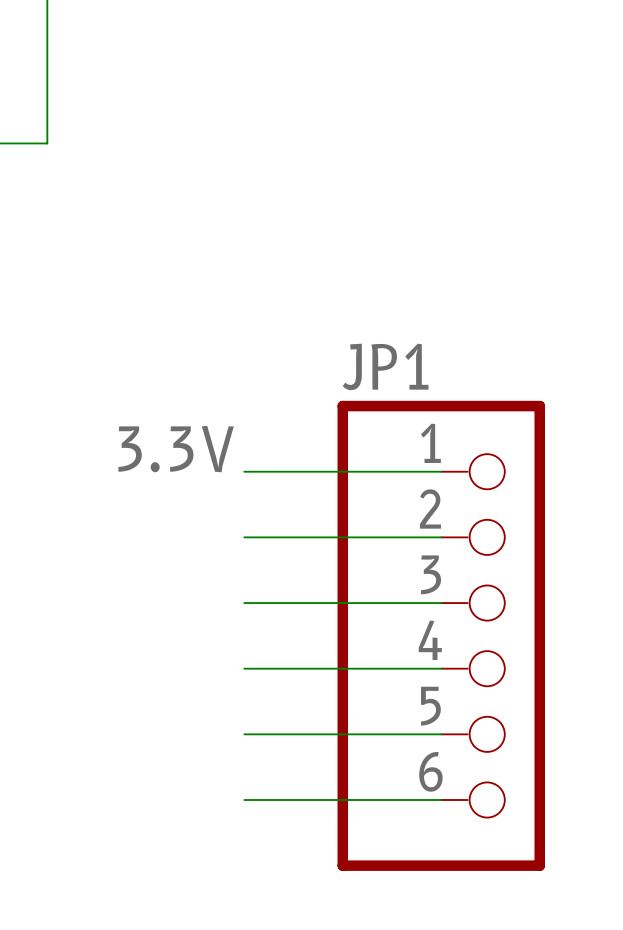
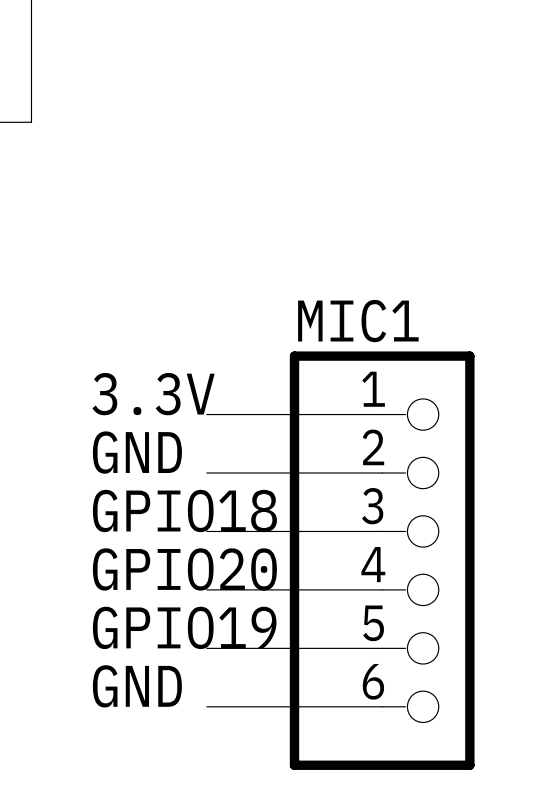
JP1 name: JP1 (385, 366) -> MIC1 (358, 321)
label: none -> GND (137, 452)
label: none -> GPIO18 (184, 511)
label: none -> GPIO20 (184, 569)
label: none -> GPIO19 (184, 627)
label: none -> GND (137, 686)

